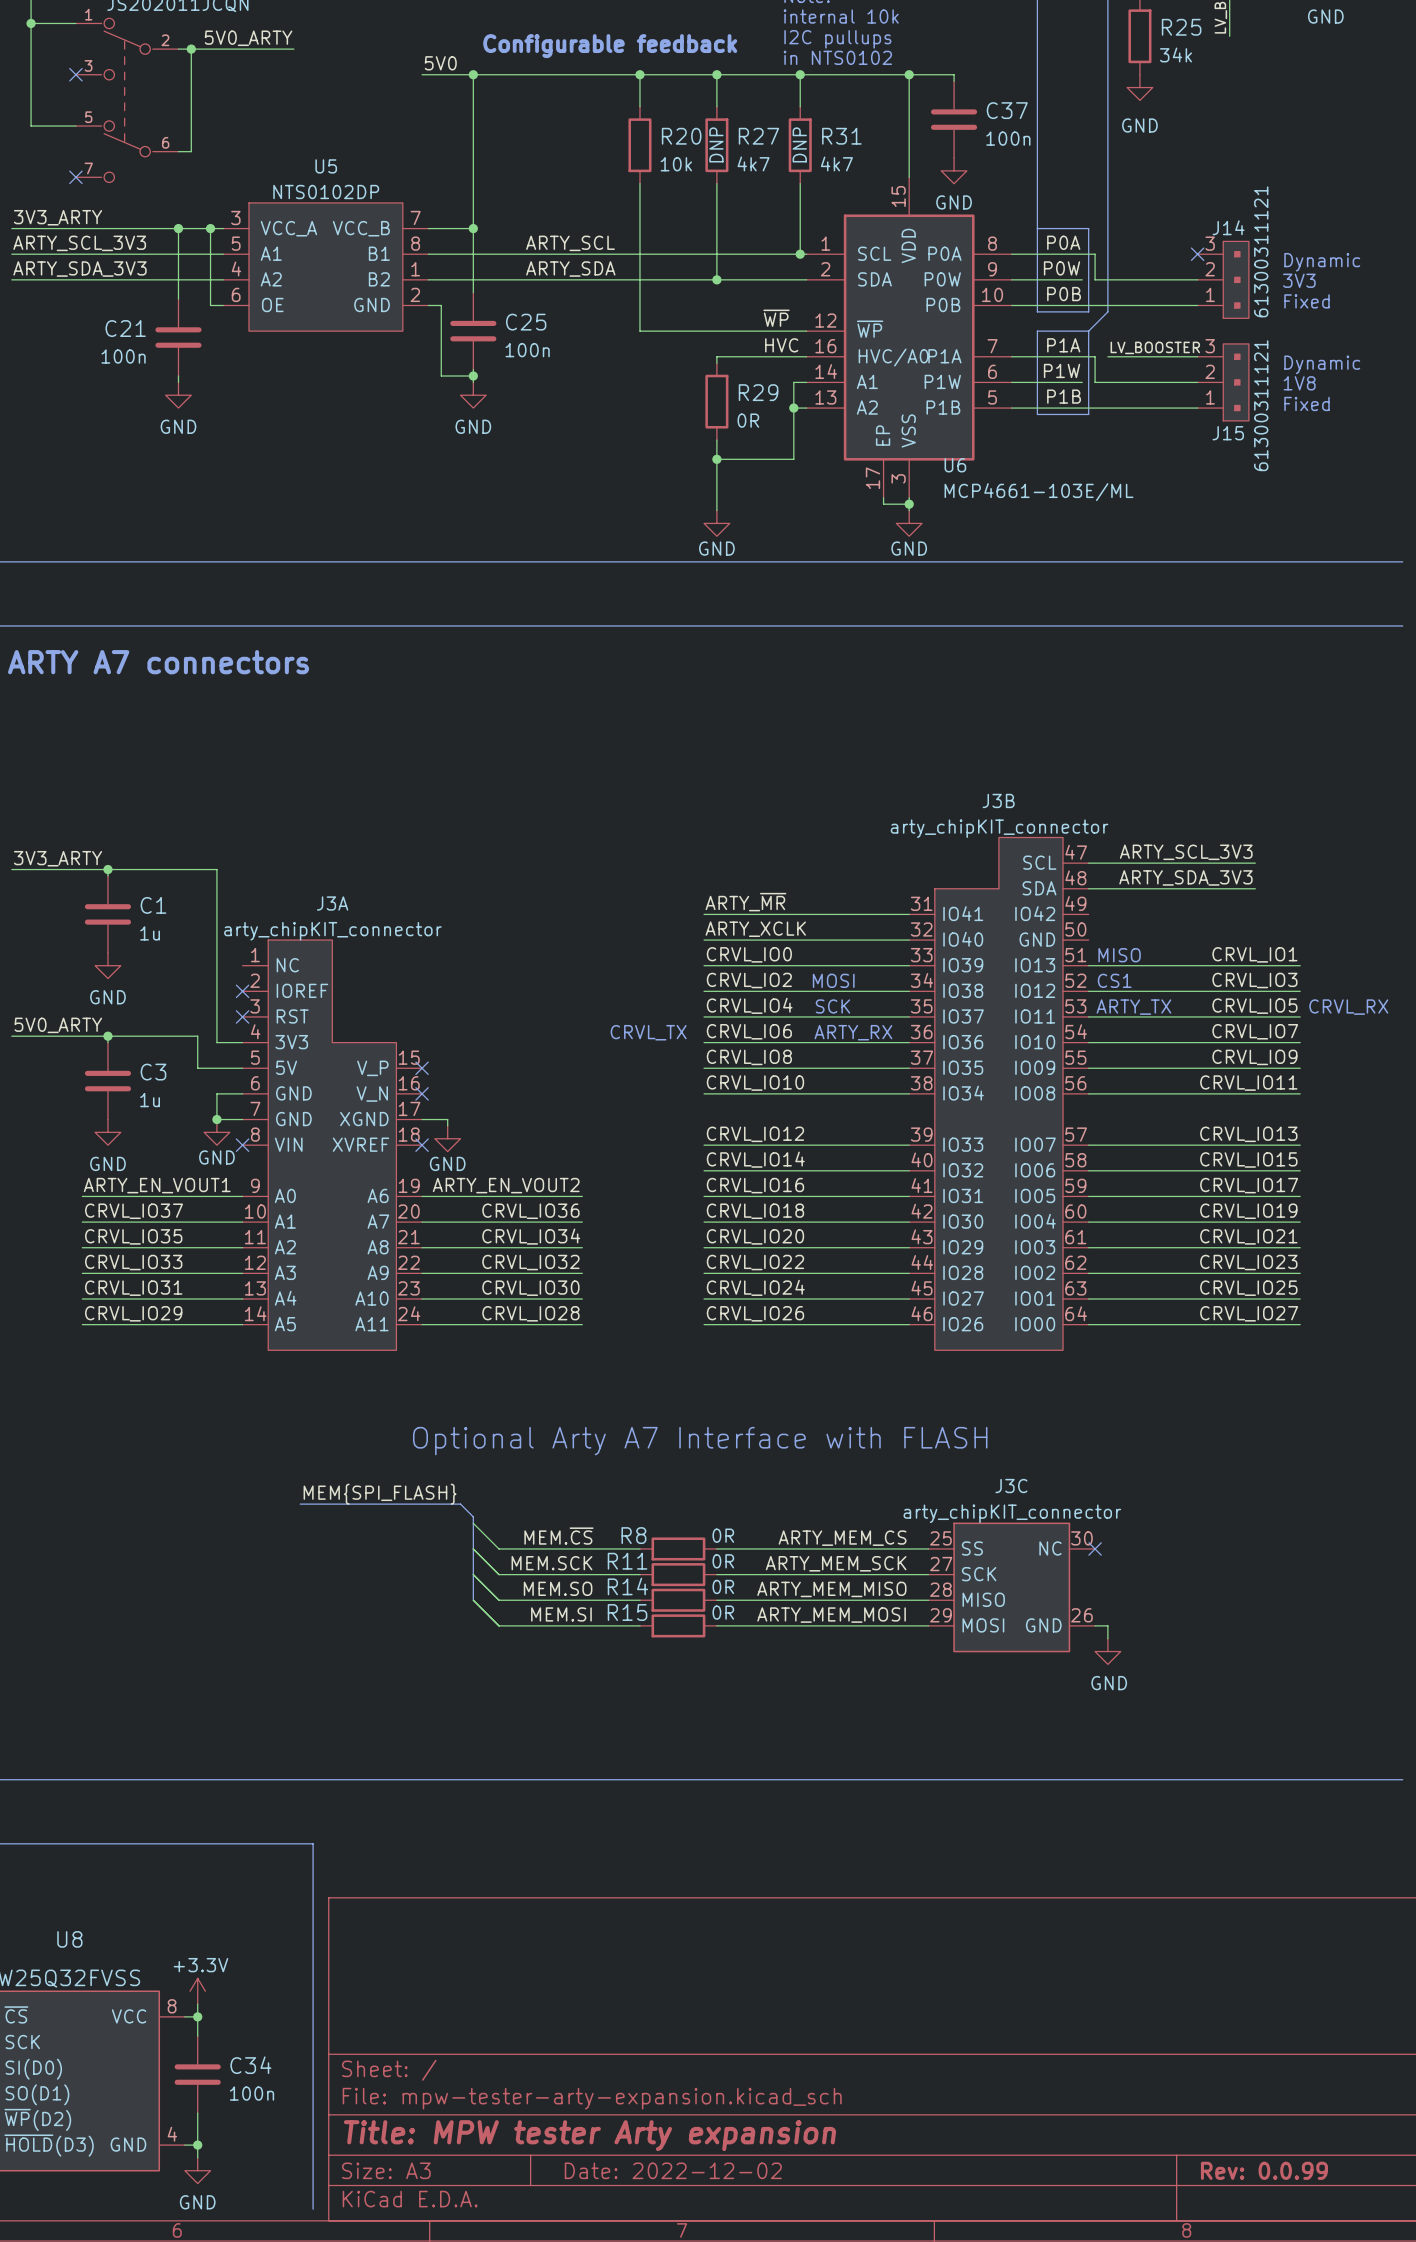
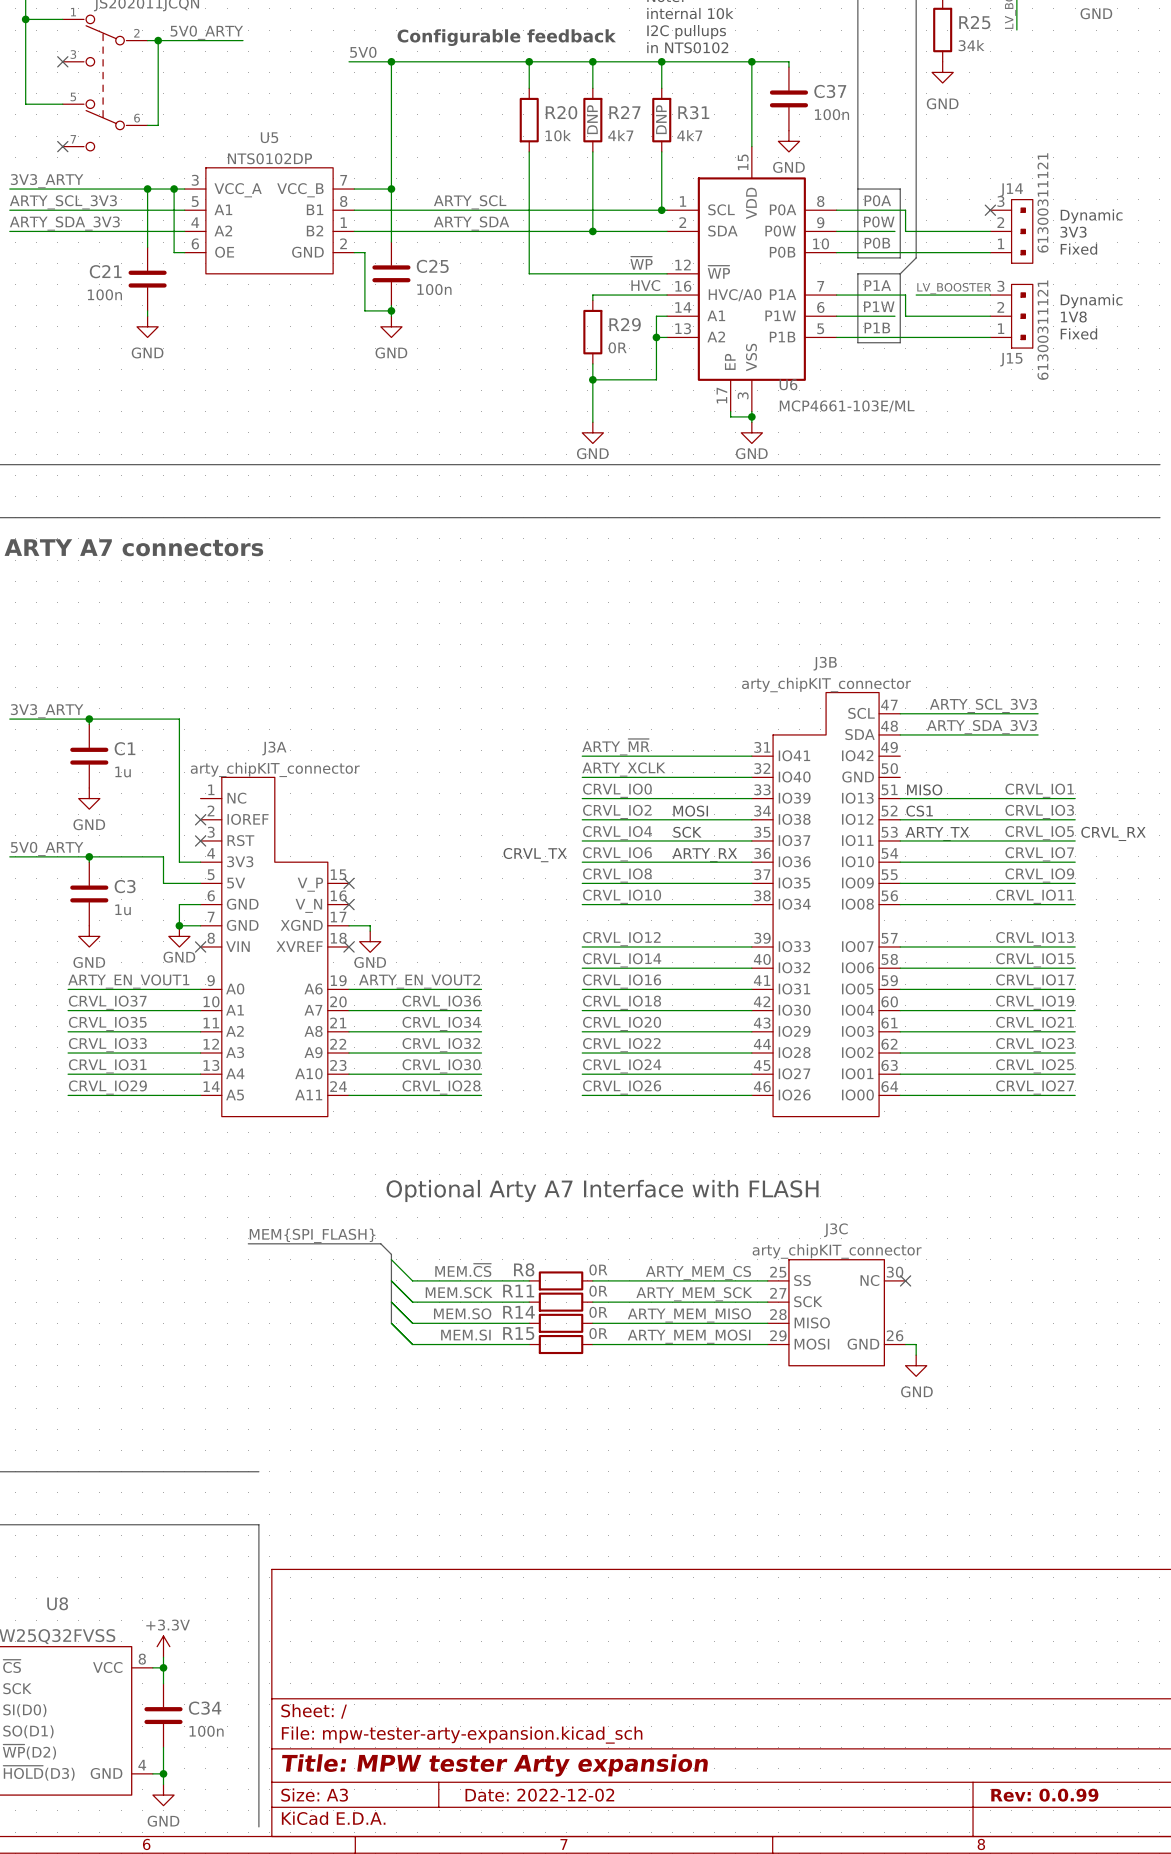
line: (313, 1779) (1402, 1779) -> none

